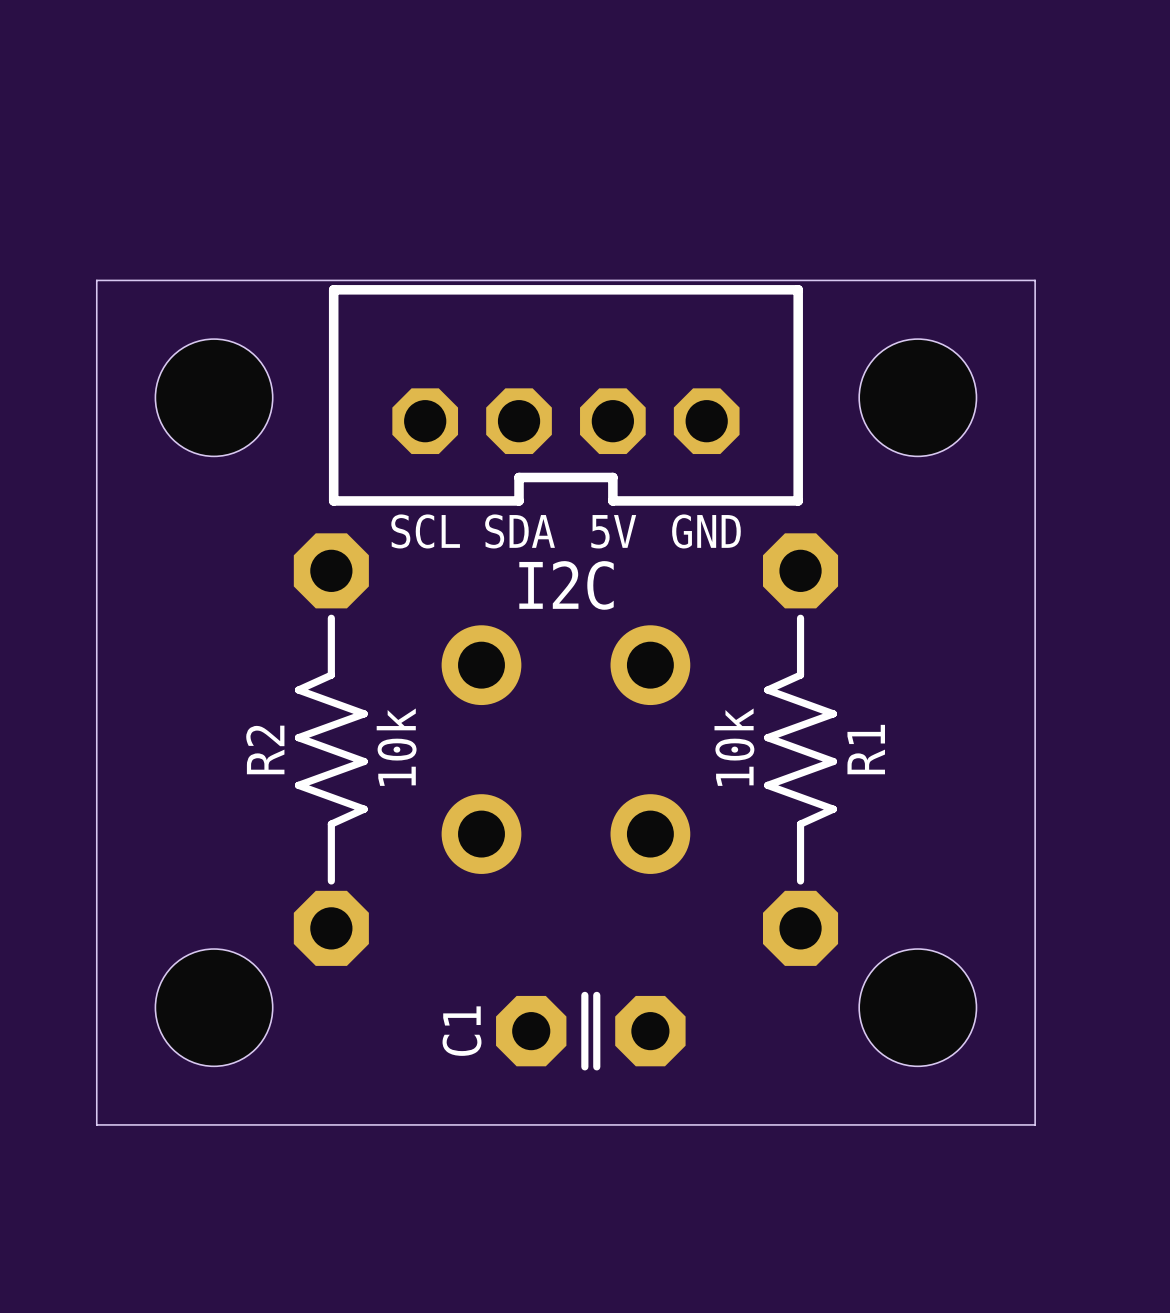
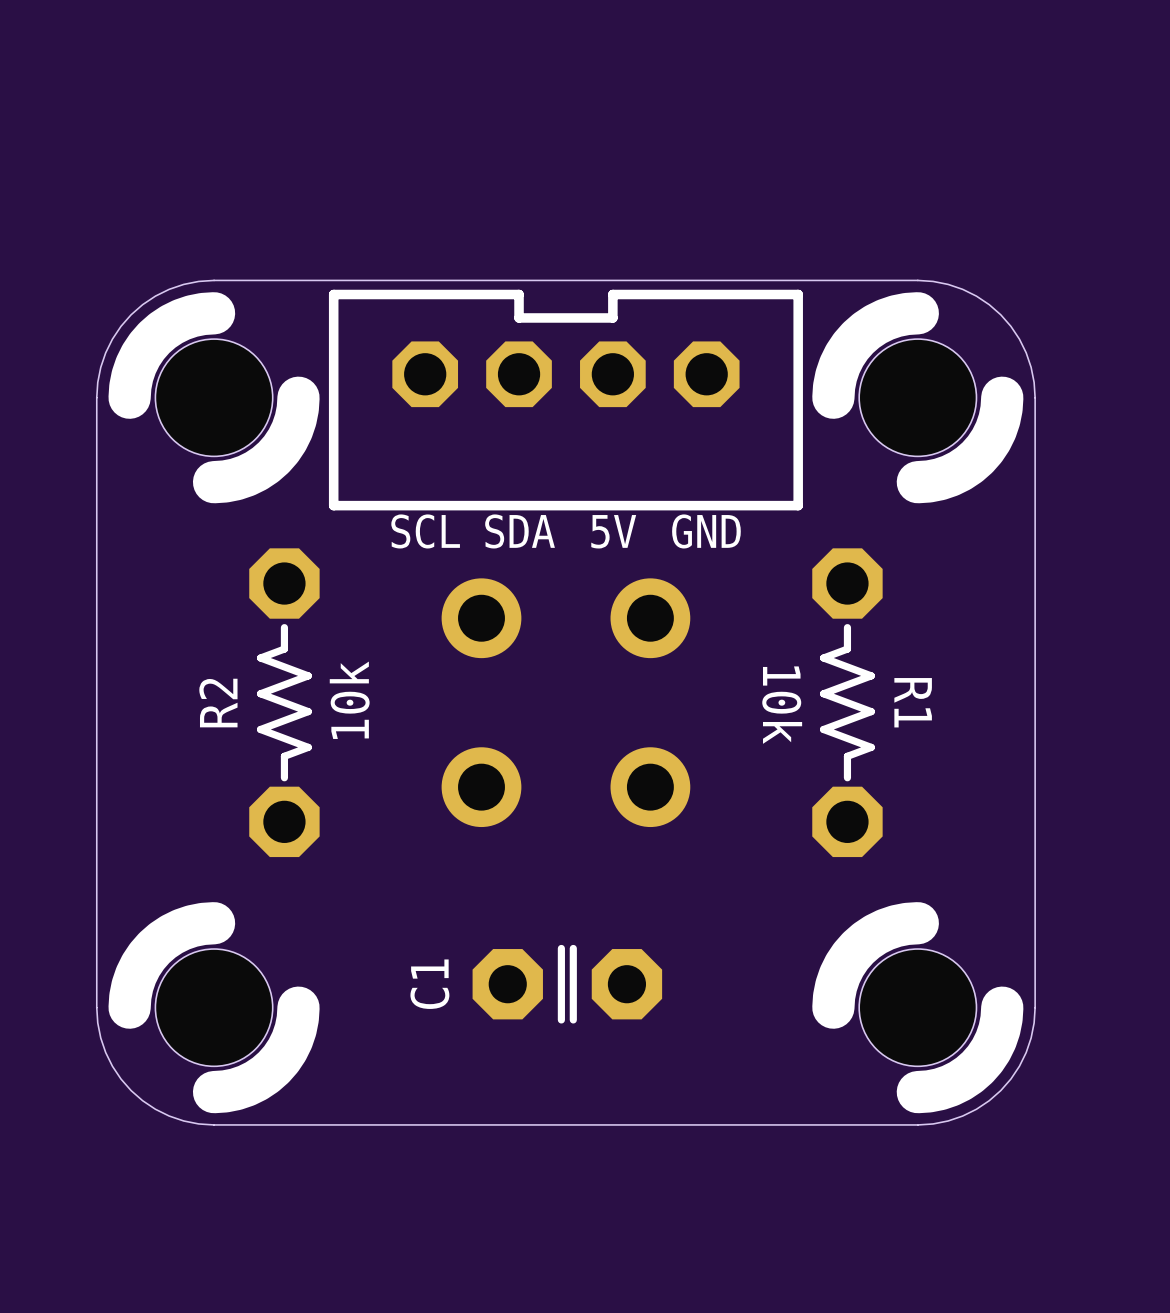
board edge: (214, 280) (96, 280) (96, 397) -> (214, 280) (198, 281) (169, 289) (155, 296) (131, 314) (112, 339) (105, 352) (97, 382) (96, 397)
board edge: (917, 280) (1035, 280) (1035, 397) -> (917, 280) (933, 281) (962, 289) (976, 296) (1000, 314) (1019, 339) (1026, 352) (1034, 382) (1035, 397)
I2C: (565, 395) -> none
hole: (214, 397) -> none
part: none -> (214, 397)
hole: (917, 397) -> none
part: none -> (917, 397)
part: none -> (565, 400)
R2 footprint: [293, 533, 369, 966] -> [249, 548, 320, 858]
R1 footprint: [763, 533, 839, 966] -> [812, 548, 883, 858]
part position: (565, 749) -> (565, 702)
board edge: (96, 1007) (96, 1124) (214, 1124) -> (96, 1007) (97, 1022) (105, 1052) (112, 1066) (131, 1090) (155, 1109) (169, 1116) (198, 1123) (214, 1124)
hole: (214, 1007) -> none
part: none -> (214, 1007)
hole: (917, 1007) -> none
part: none -> (917, 1007)
board edge: (1035, 1007) (1035, 1124) (917, 1124) -> (1035, 1007) (1034, 1022) (1026, 1052) (1019, 1066) (1000, 1090) (976, 1109) (962, 1116) (933, 1123) (917, 1124)
C1 name position: C1 (462, 1031) -> C1 (429, 984)
C1 position: (590, 1031) -> (567, 984)

